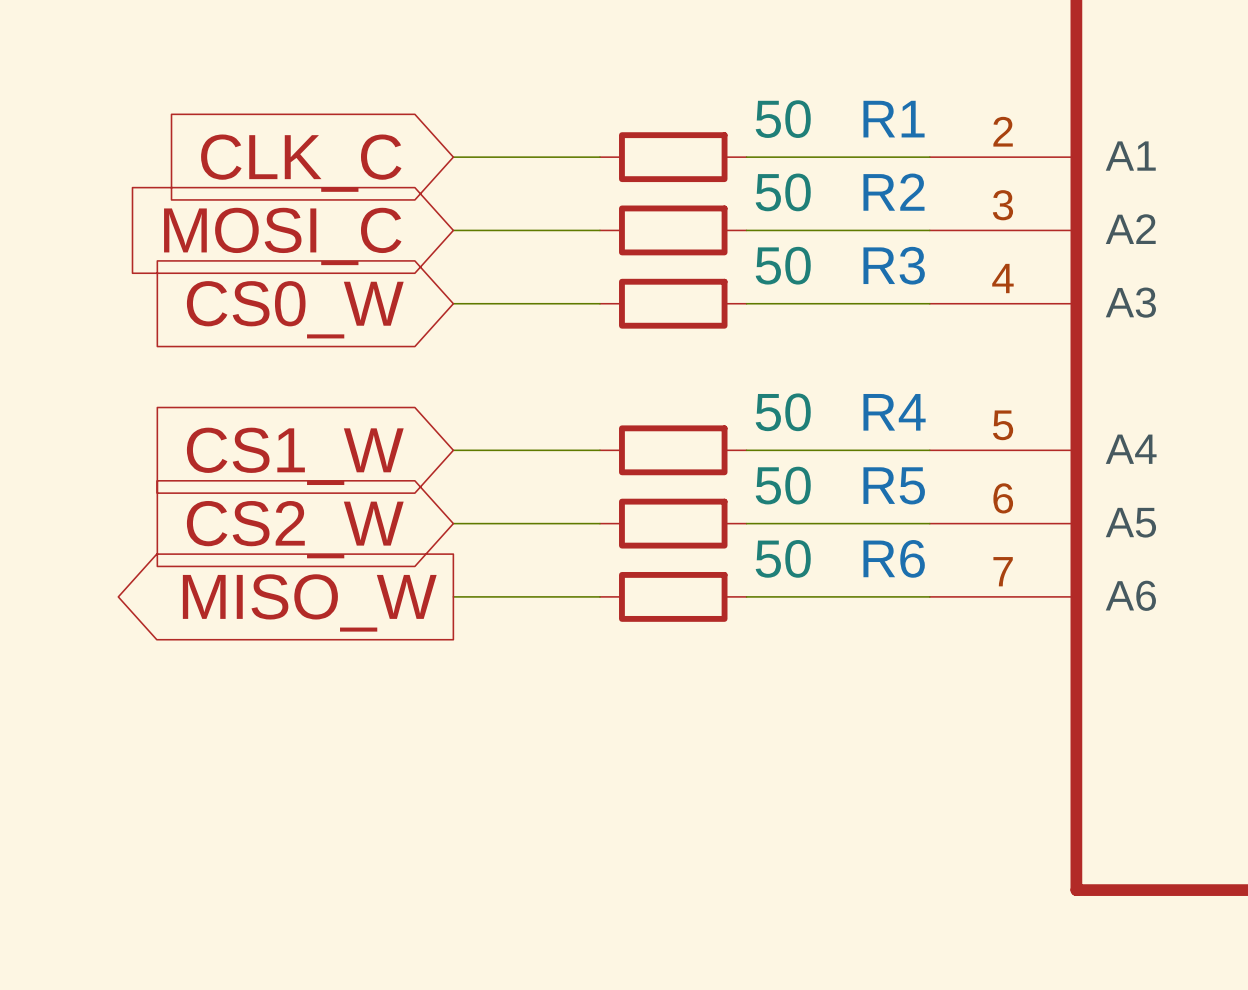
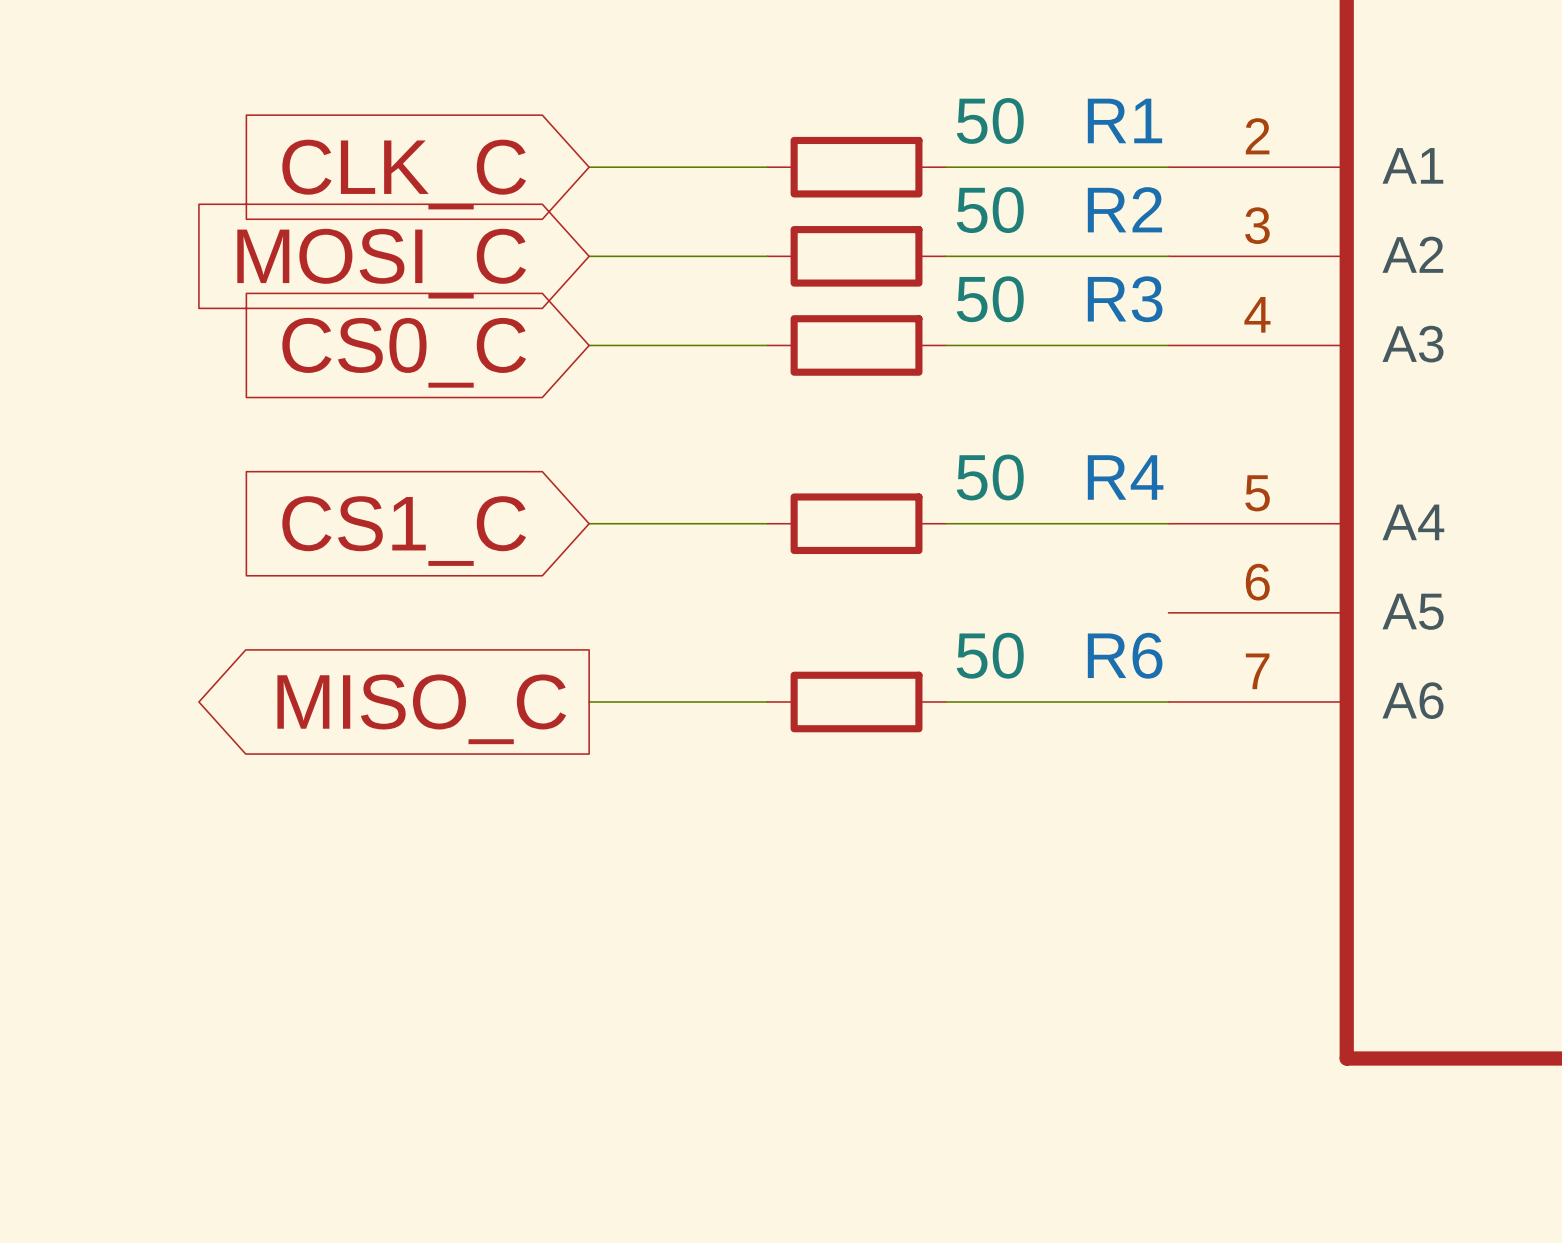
global label: CS0_W (295, 309) -> CS0_C (404, 352)
global label: CS1_W (295, 456) -> CS1_C (404, 531)
wire: (453, 523) (599, 523) -> none
R5: 50 (673, 523) -> none
wire: (746, 523) (929, 523) -> none
global label: CS2_W (295, 529) -> none
global label: MISO_W (309, 602) -> MISO_C (421, 709)

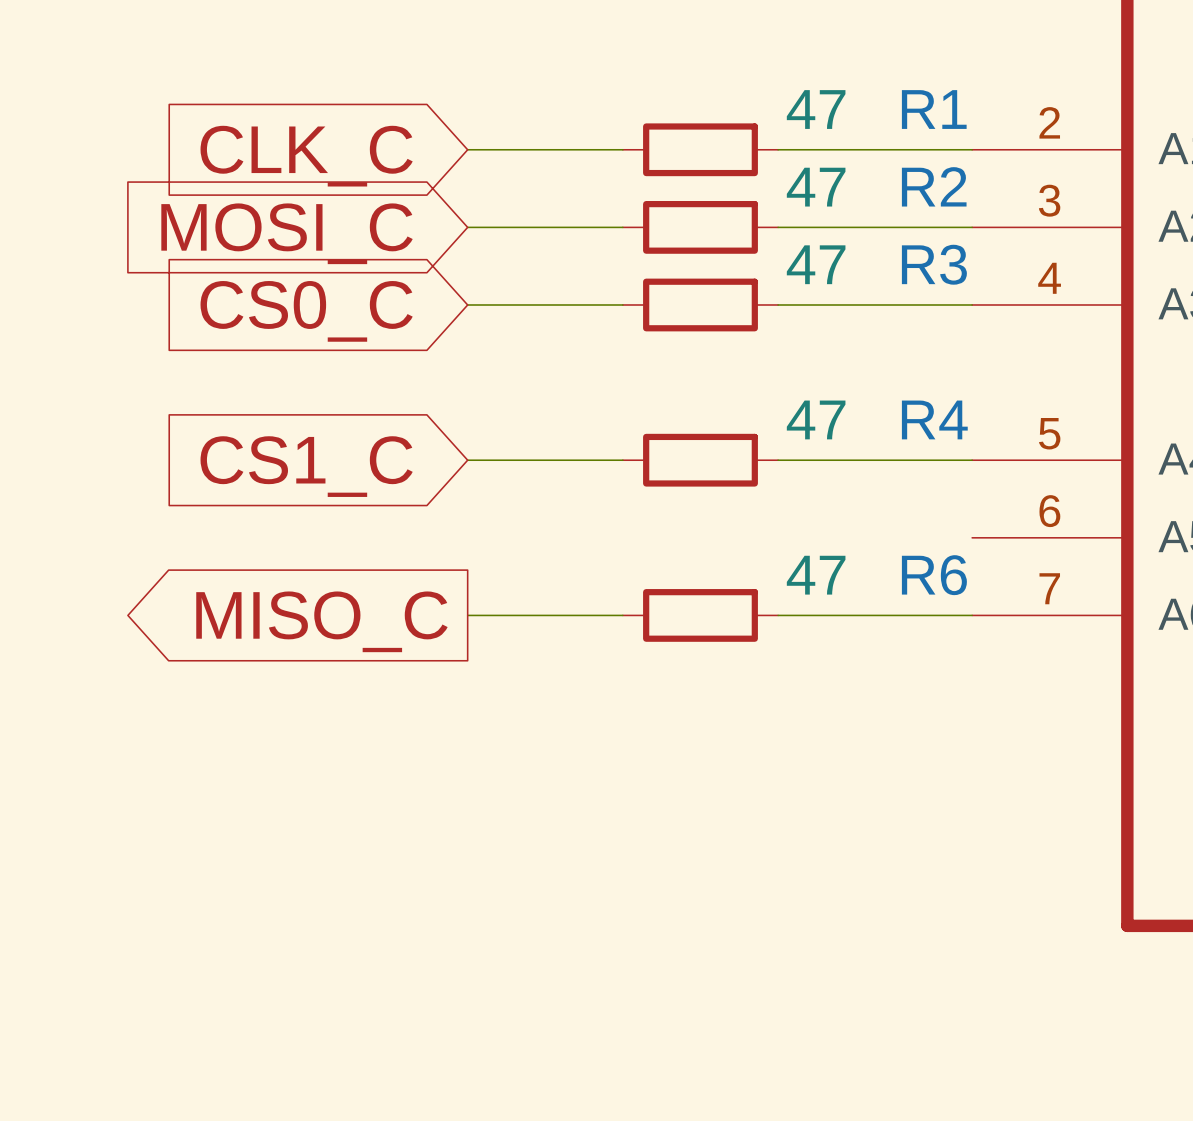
R1 value: 50 (990, 120) -> 47 (816, 109)
R2 value: 50 (990, 210) -> 47 (816, 187)
R3 value: 50 (990, 299) -> 47 (816, 264)
R4 value: 50 (990, 477) -> 47 (816, 419)
R6 value: 50 (990, 655) -> 47 (816, 575)

